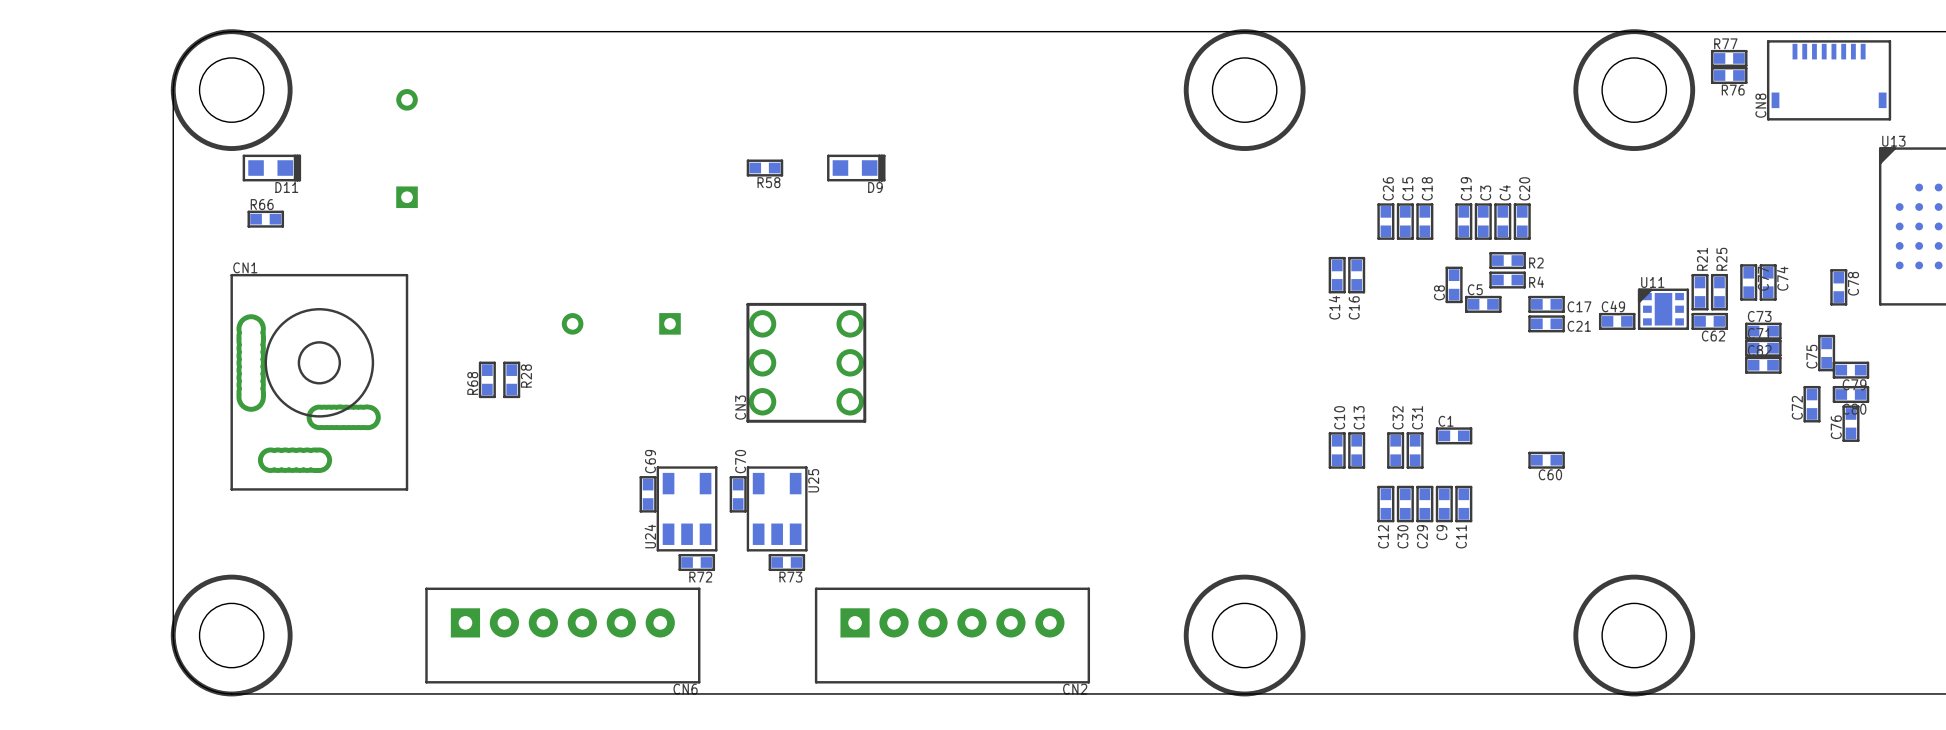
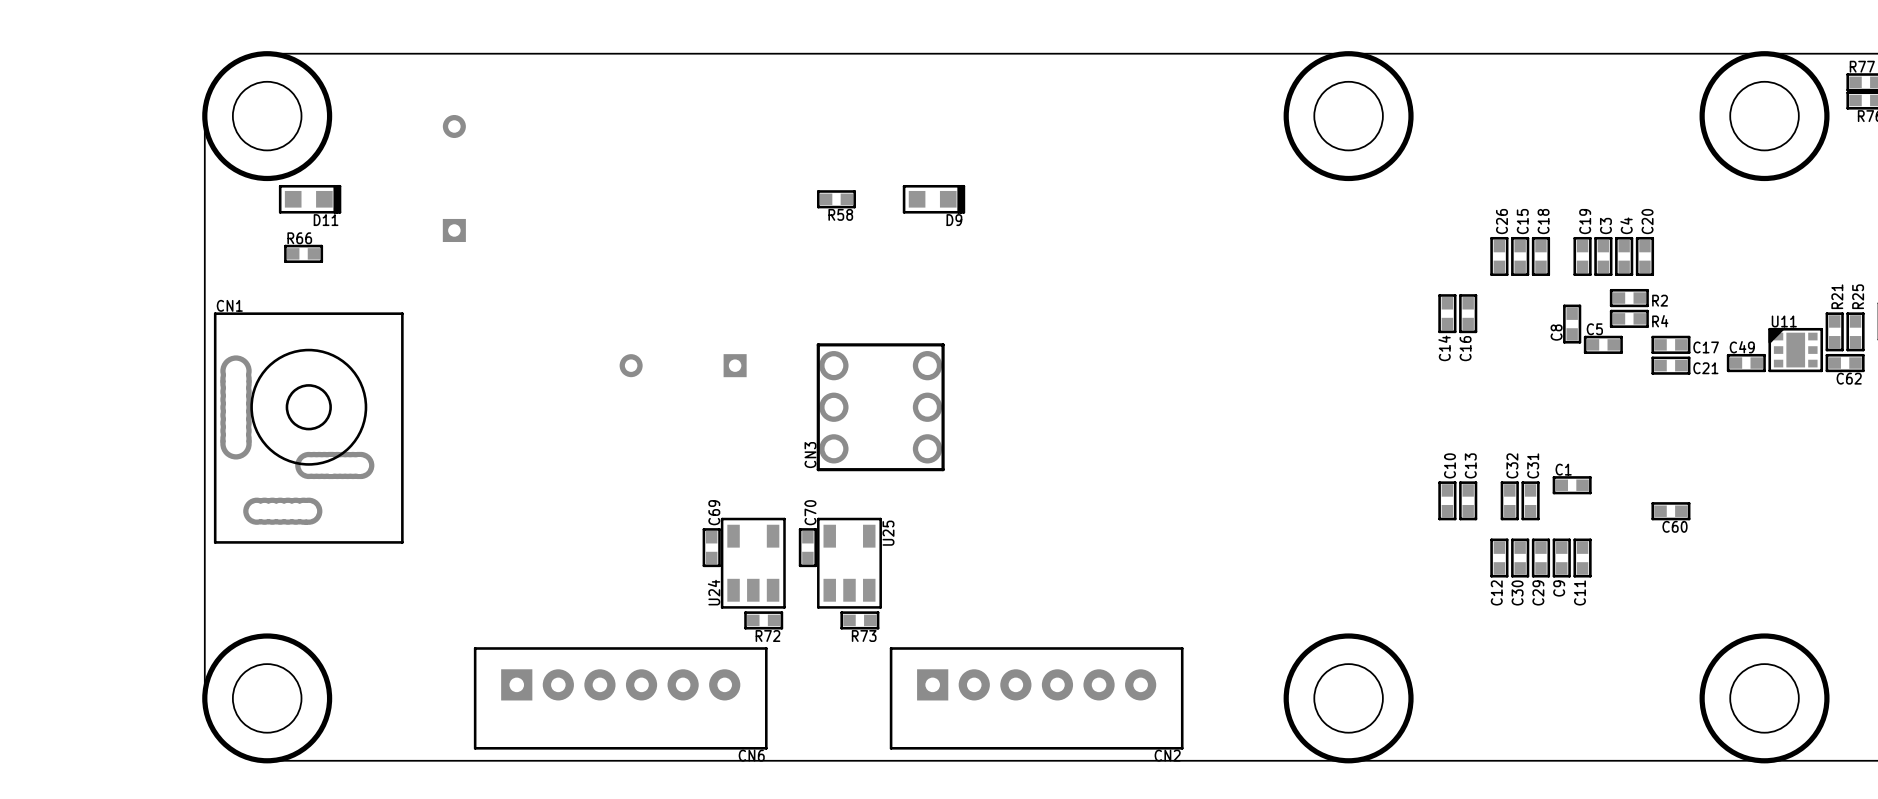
R68: (487, 379) -> none
R28: (511, 379) -> none
CN1 position: (319, 382) -> (308, 428)

